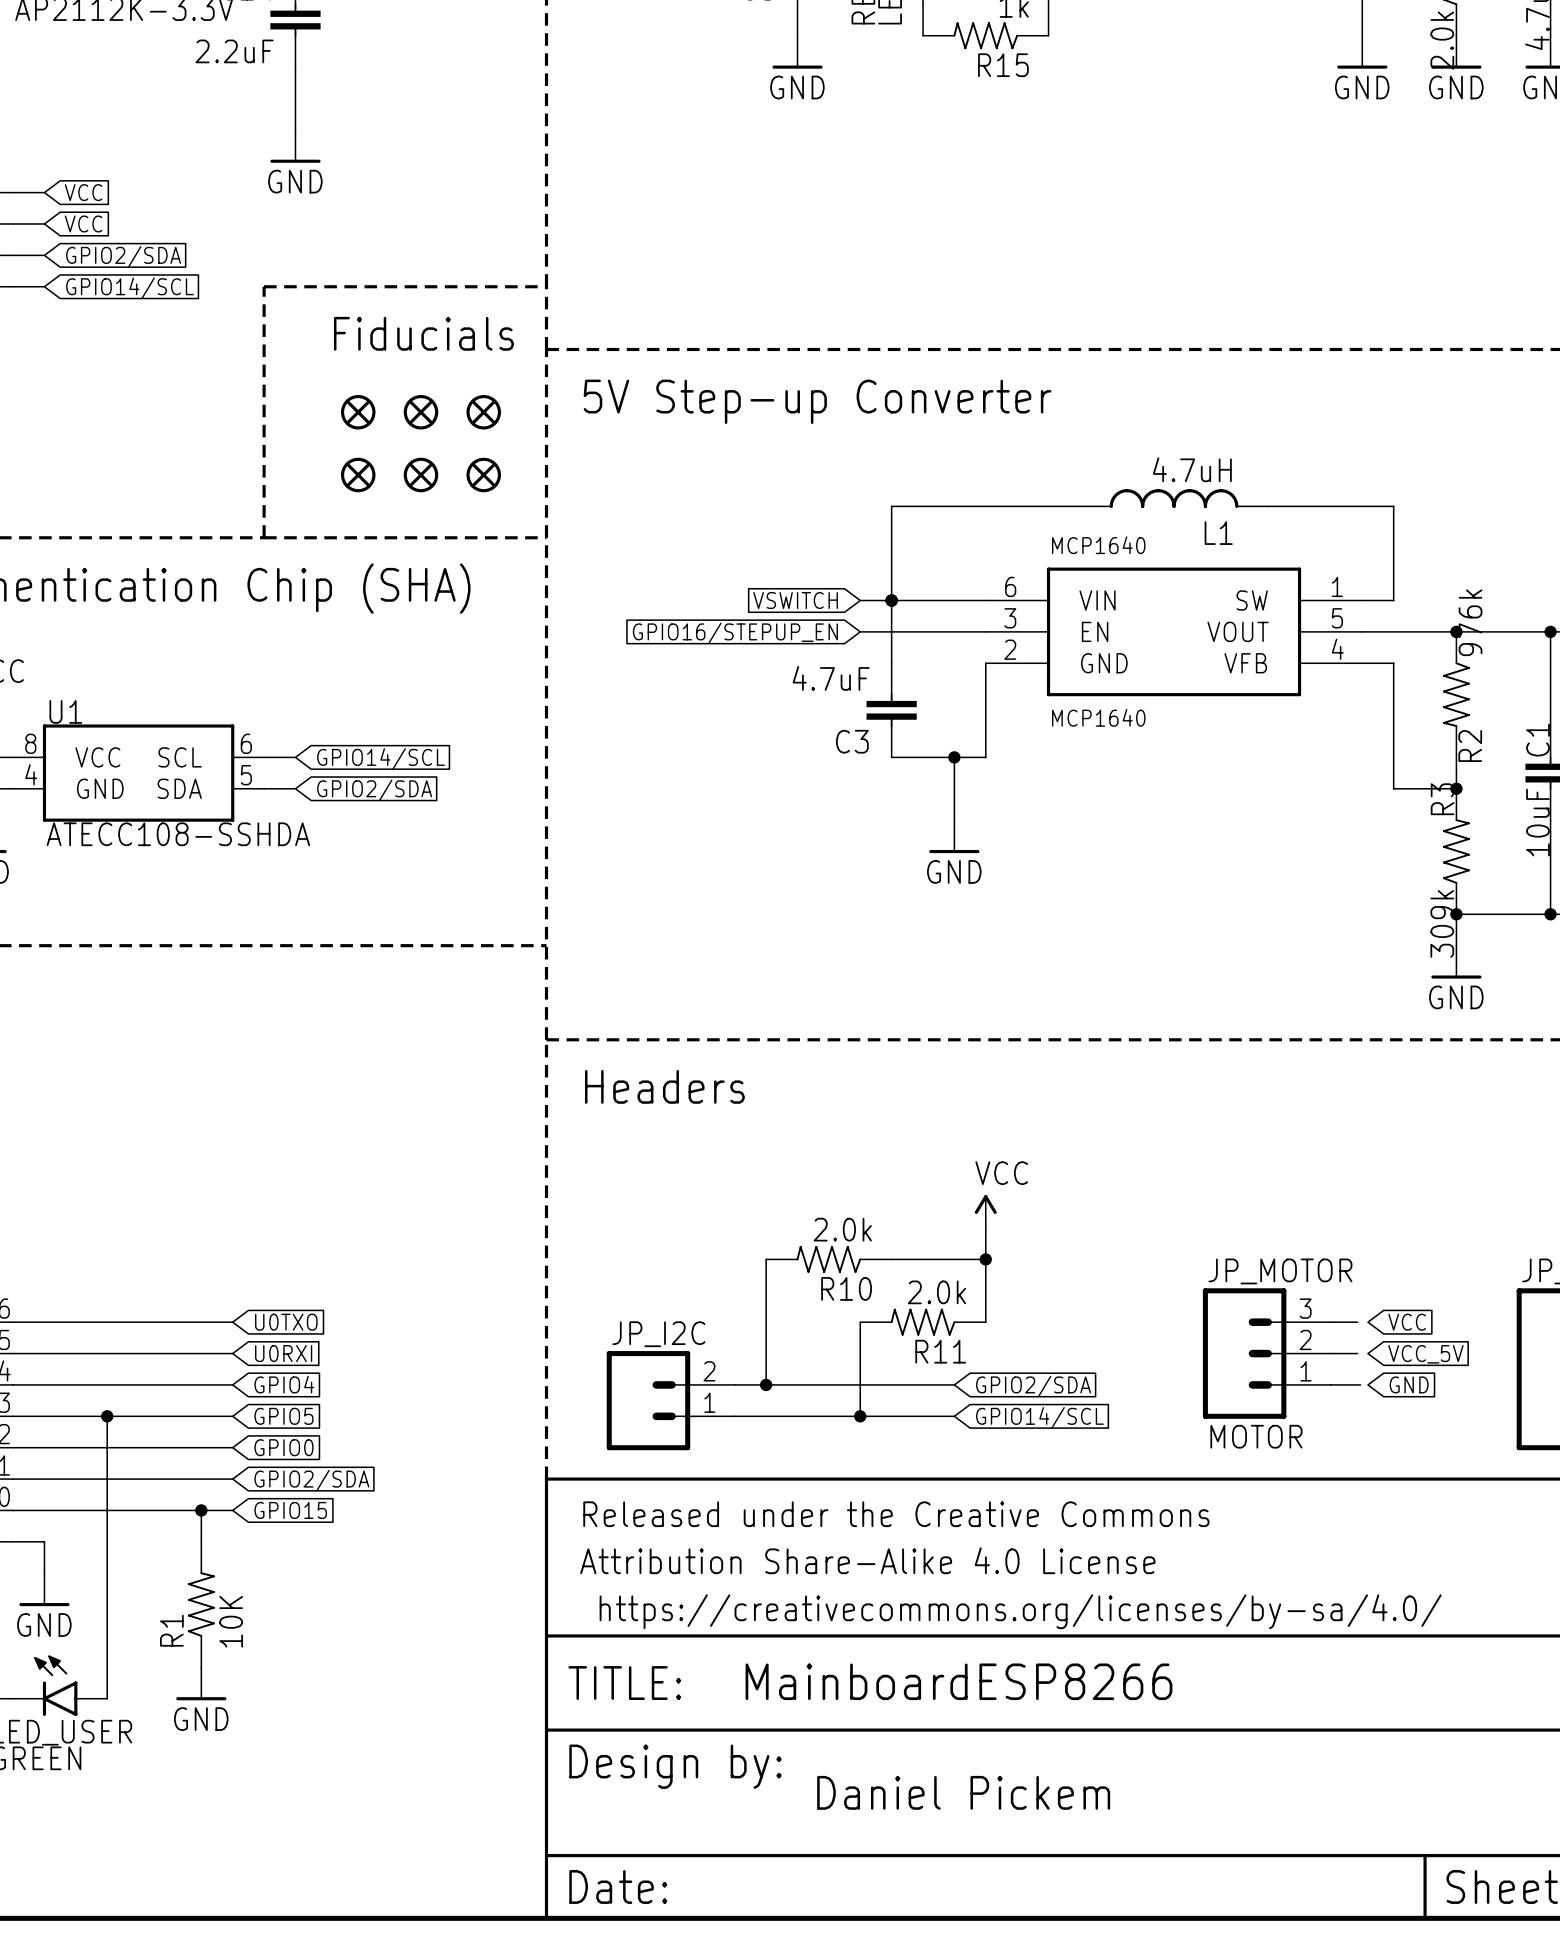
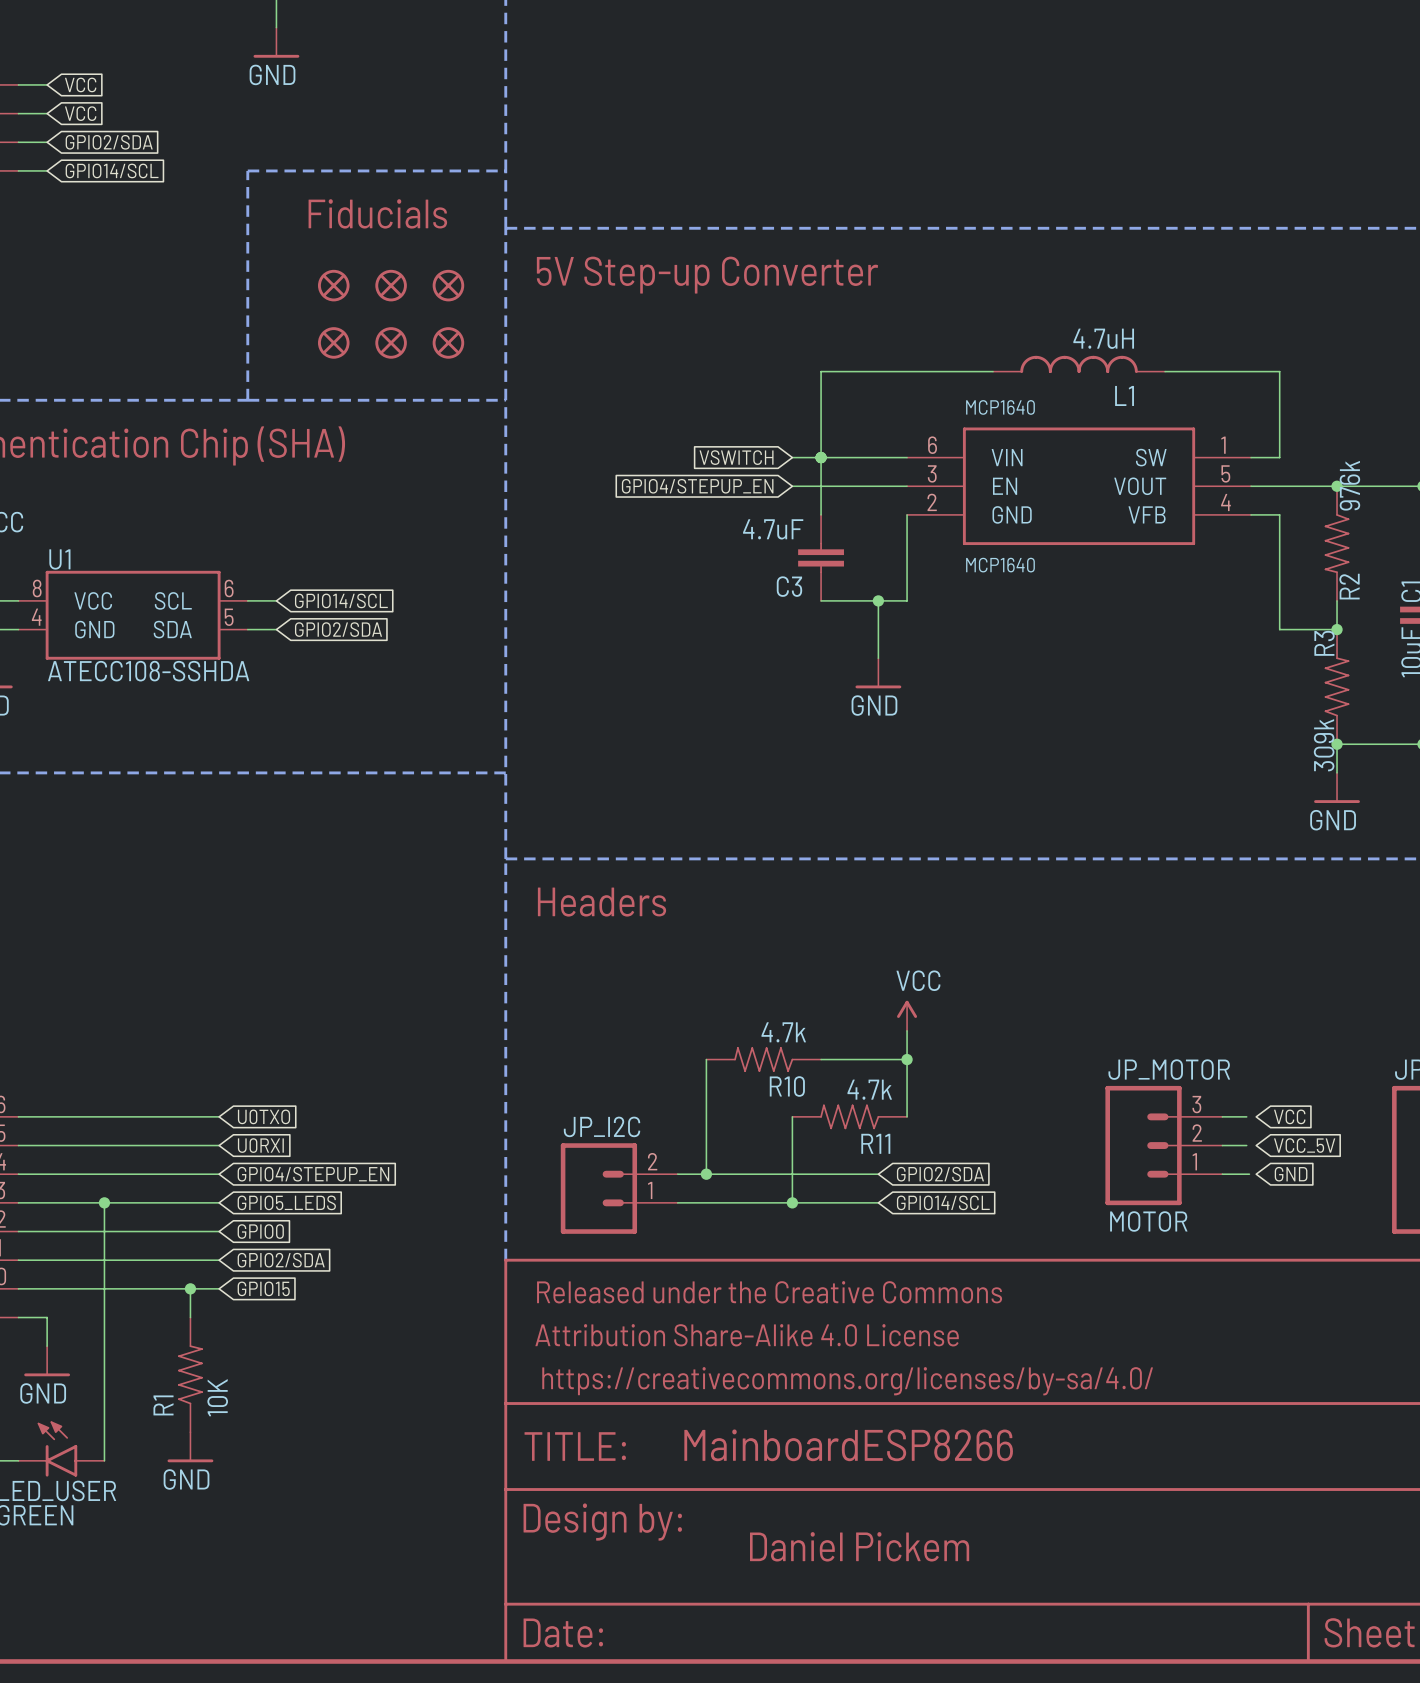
global label: GPIO16/STEPUP_EN (735, 633) -> GPIO4/STEPUP_EN (697, 486)
R10 value: 2.0k (842, 1229) -> 4.7k (783, 1032)
R11 value: 2.0k (936, 1292) -> 4.7k (869, 1089)
global label: GPIO4 (284, 1384) -> GPIO4/STEPUP_EN (313, 1174)
global label: GPIO5 (283, 1416) -> GPIO5_LEDS (286, 1202)

